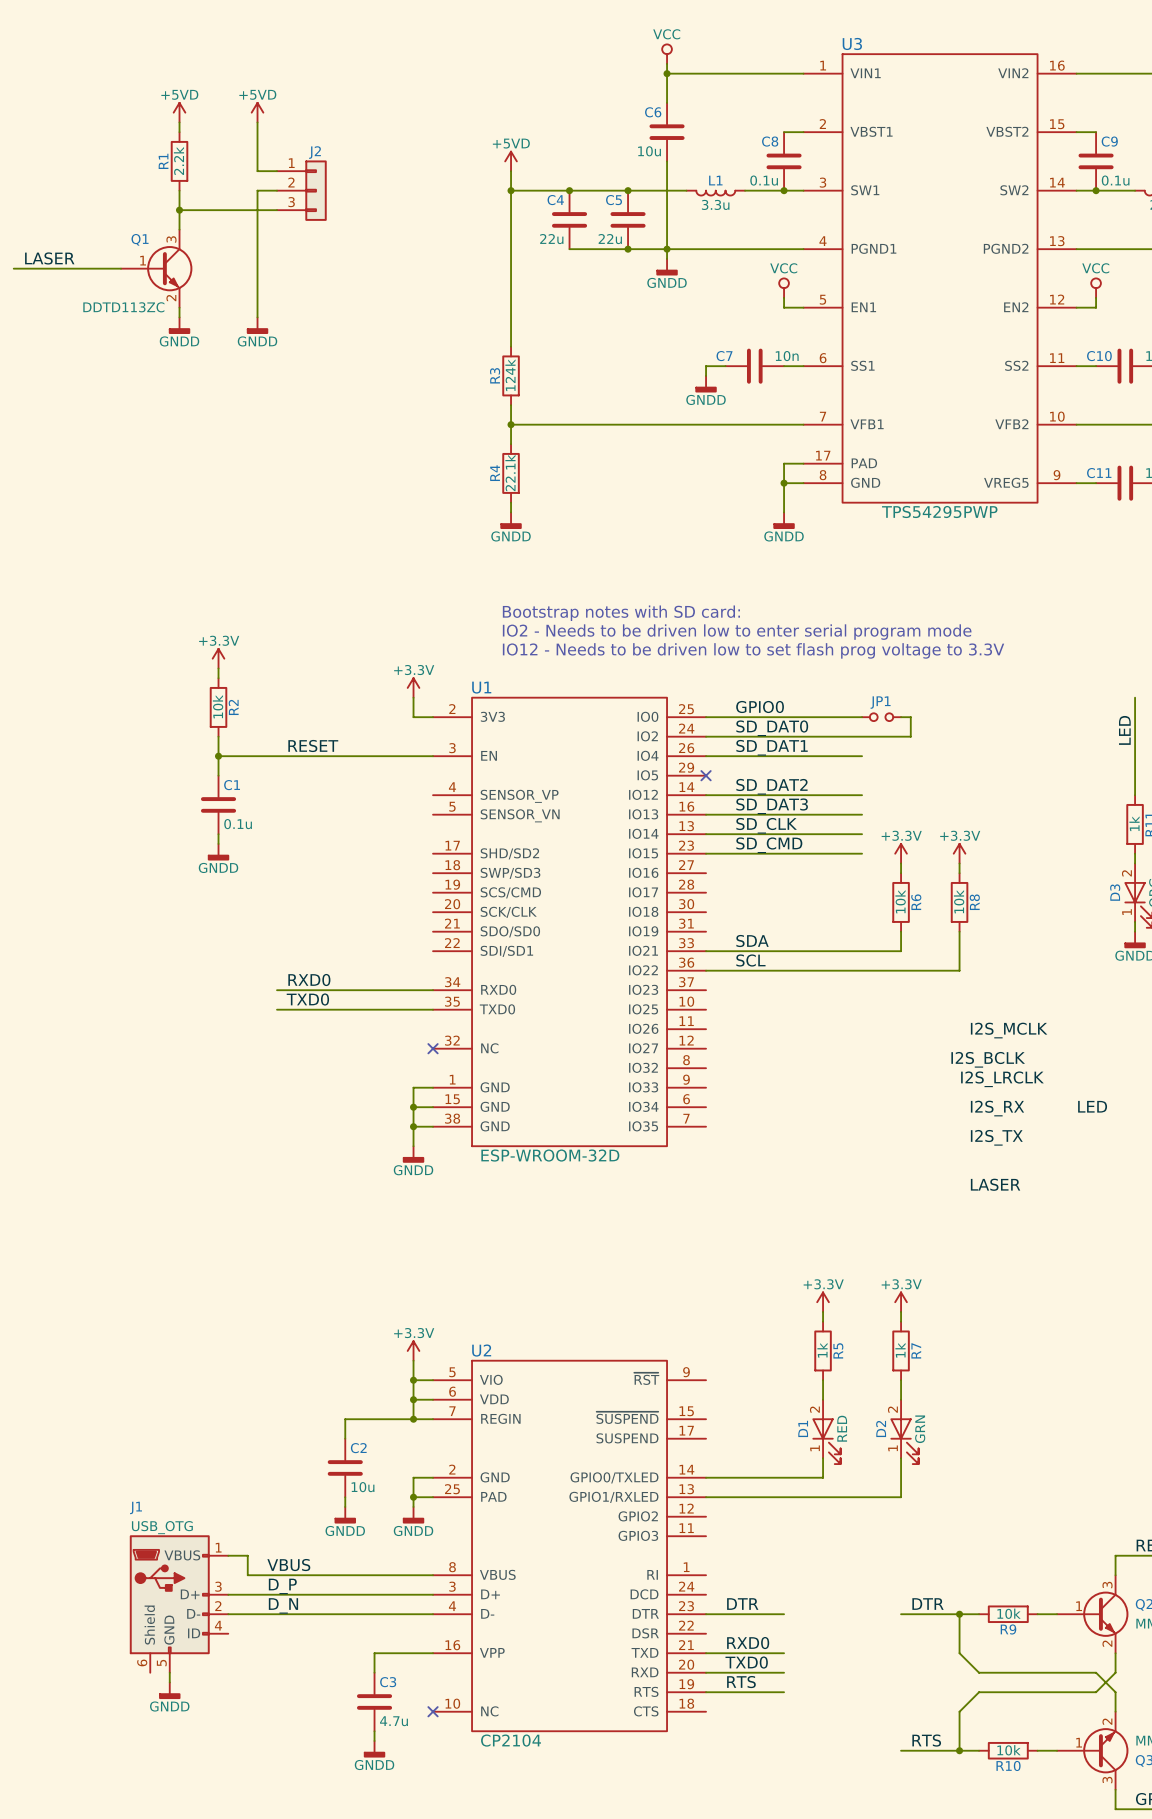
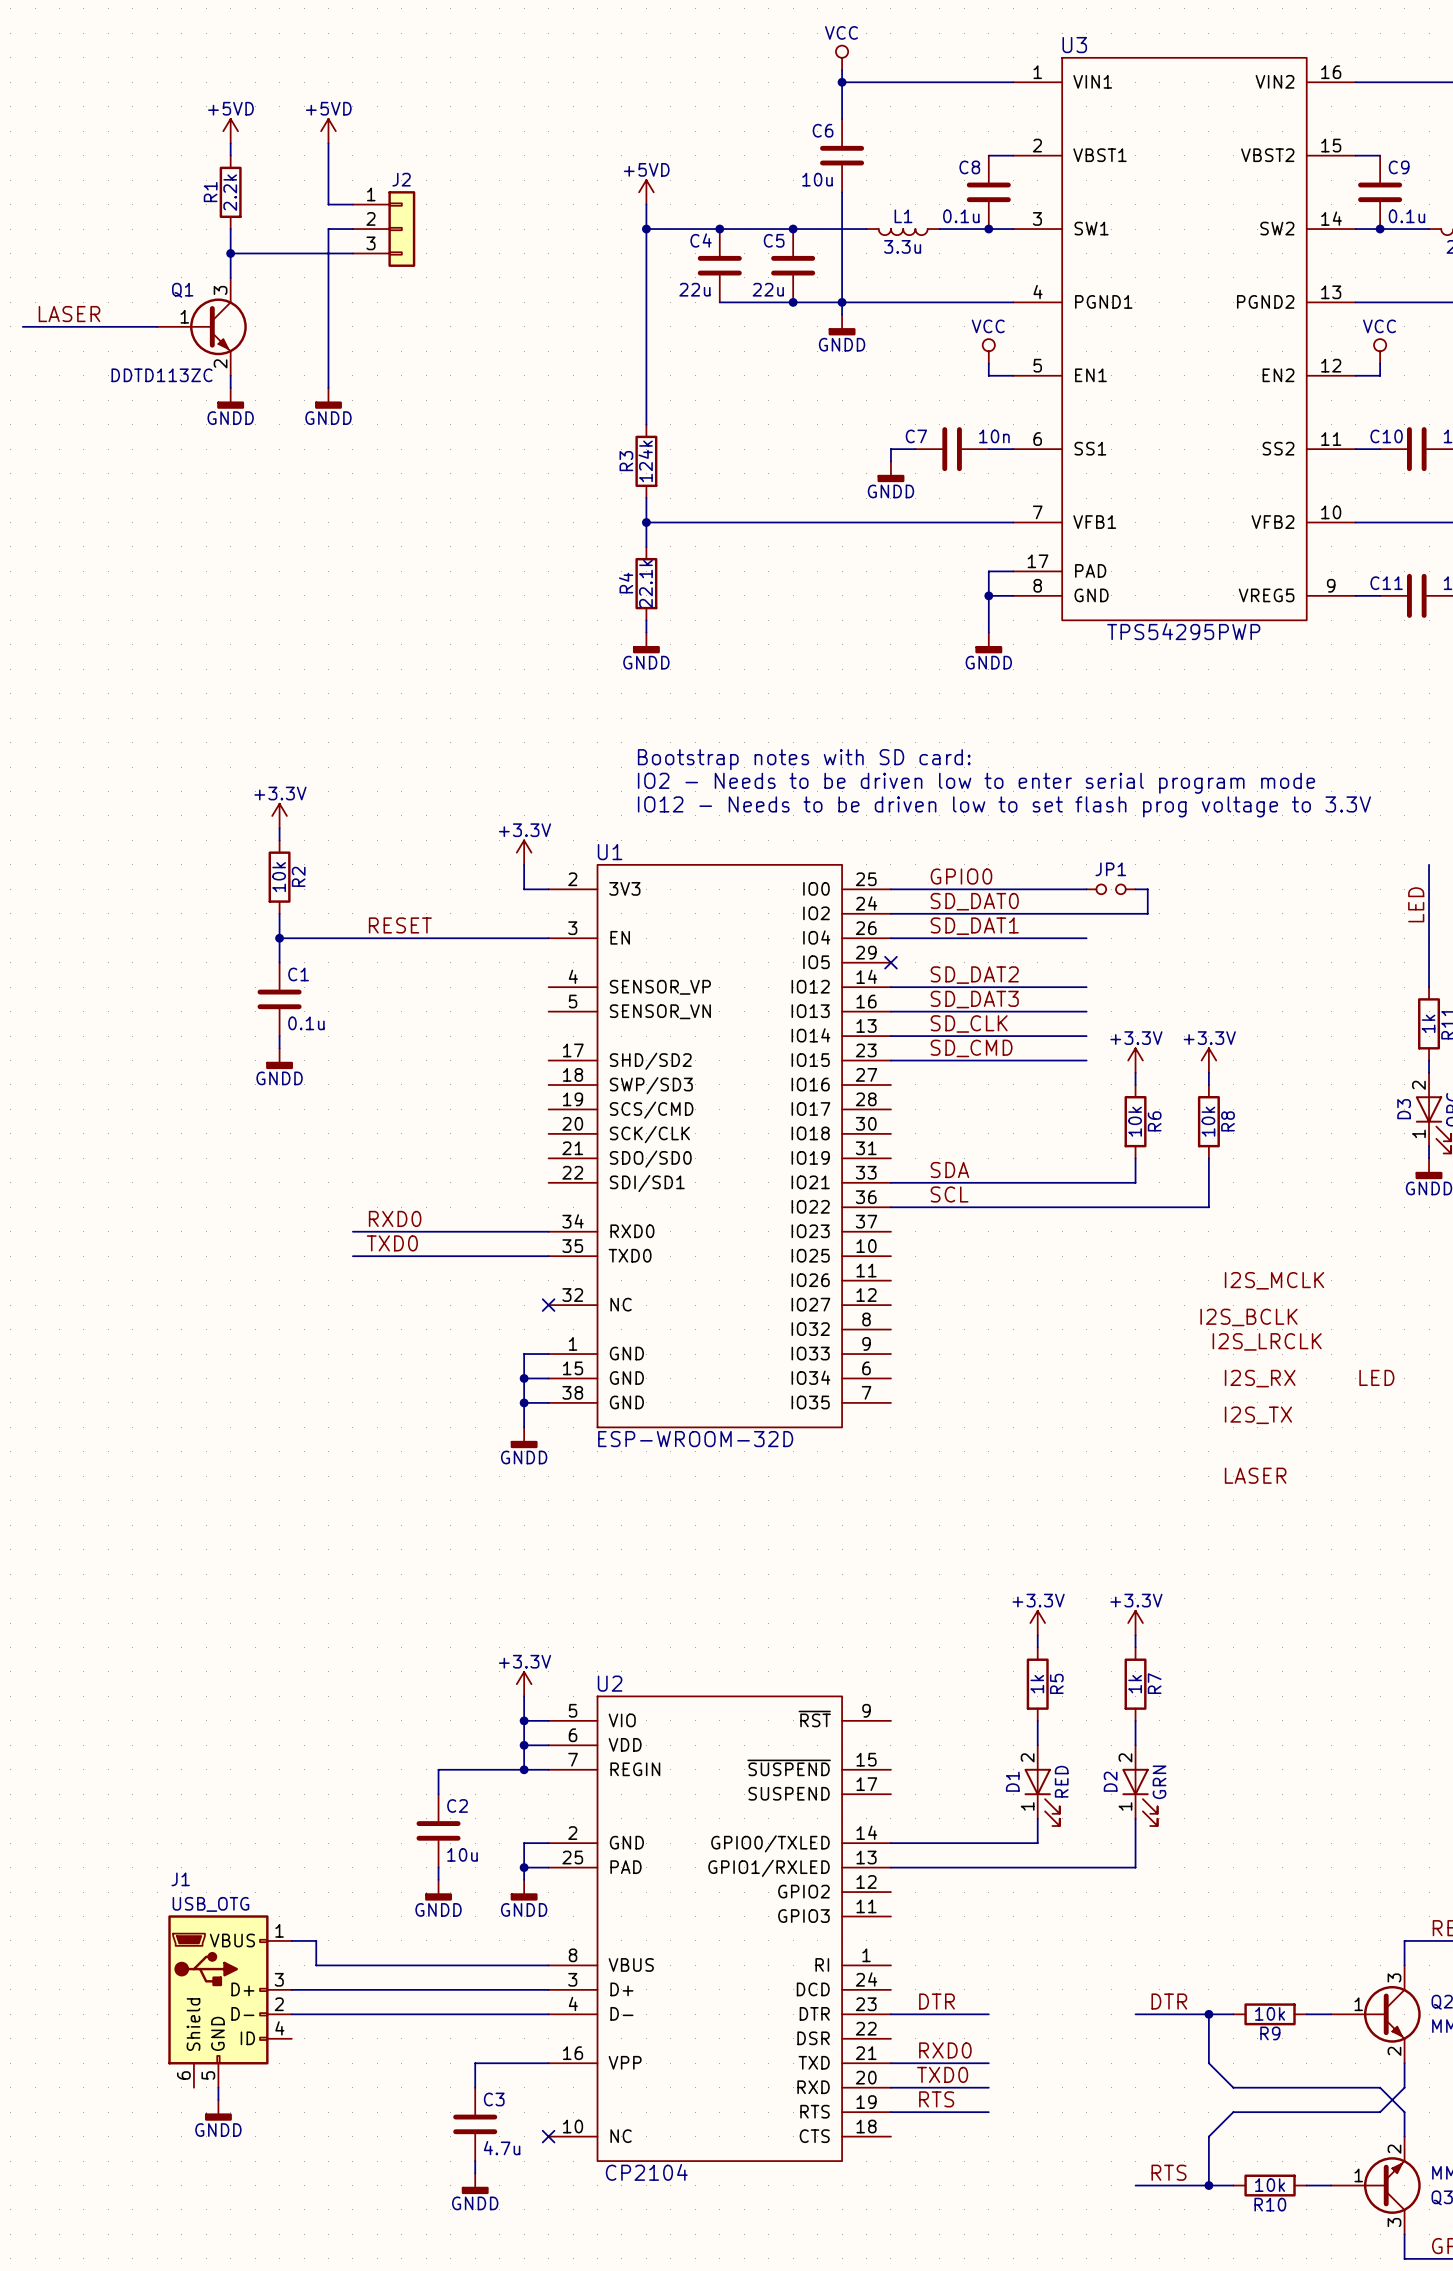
label: VBUS (288, 1565) -> none
label: D_P (282, 1586) -> none
label: D_N (283, 1605) -> none

